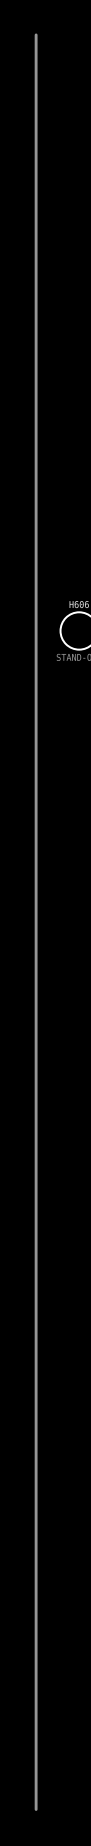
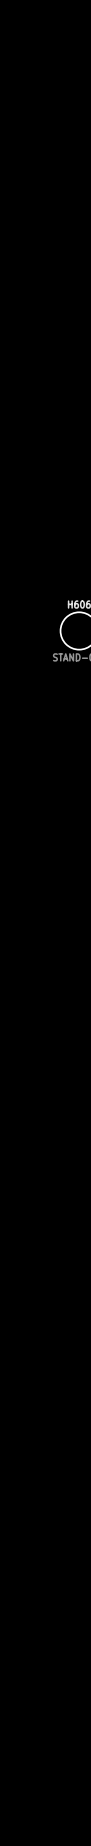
line: (36, 34) (36, 1809) -> none

